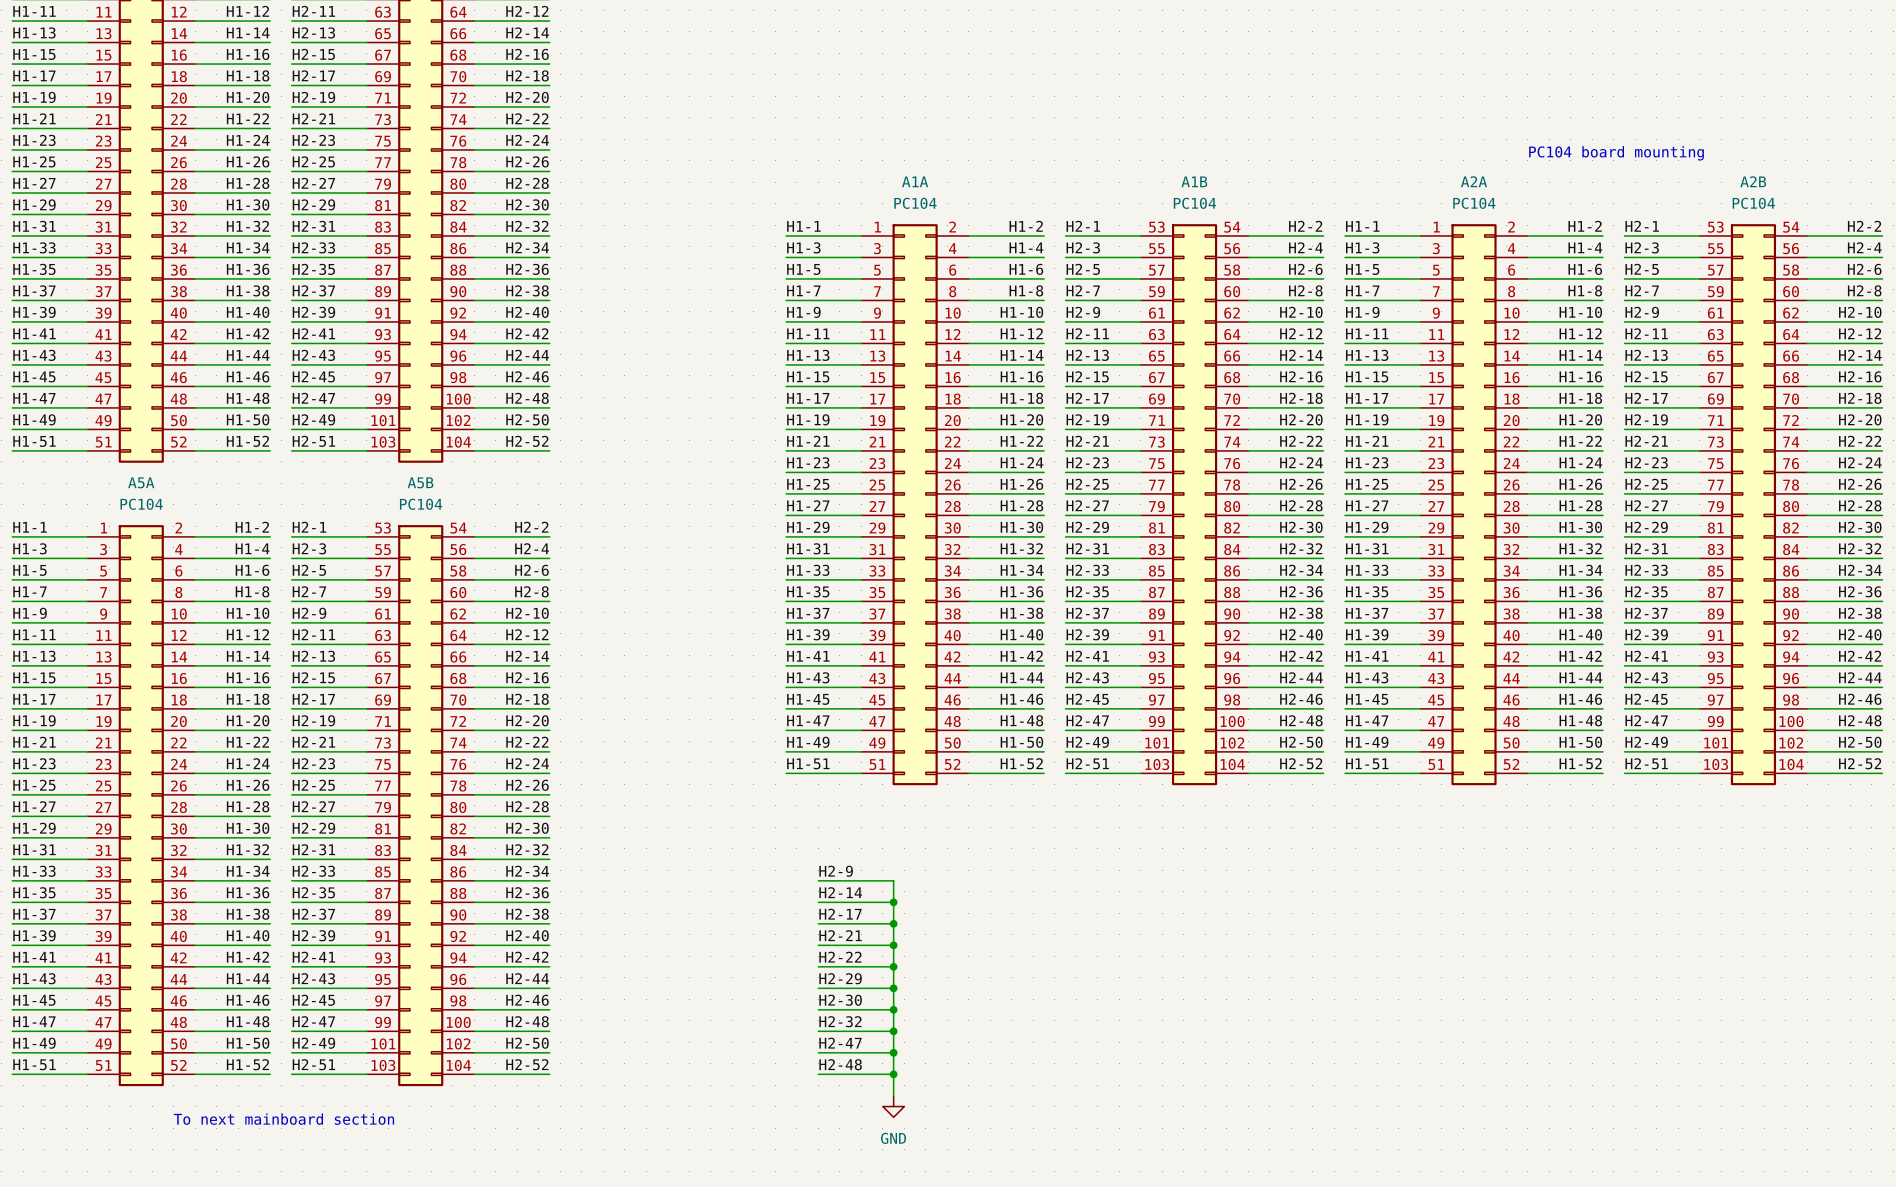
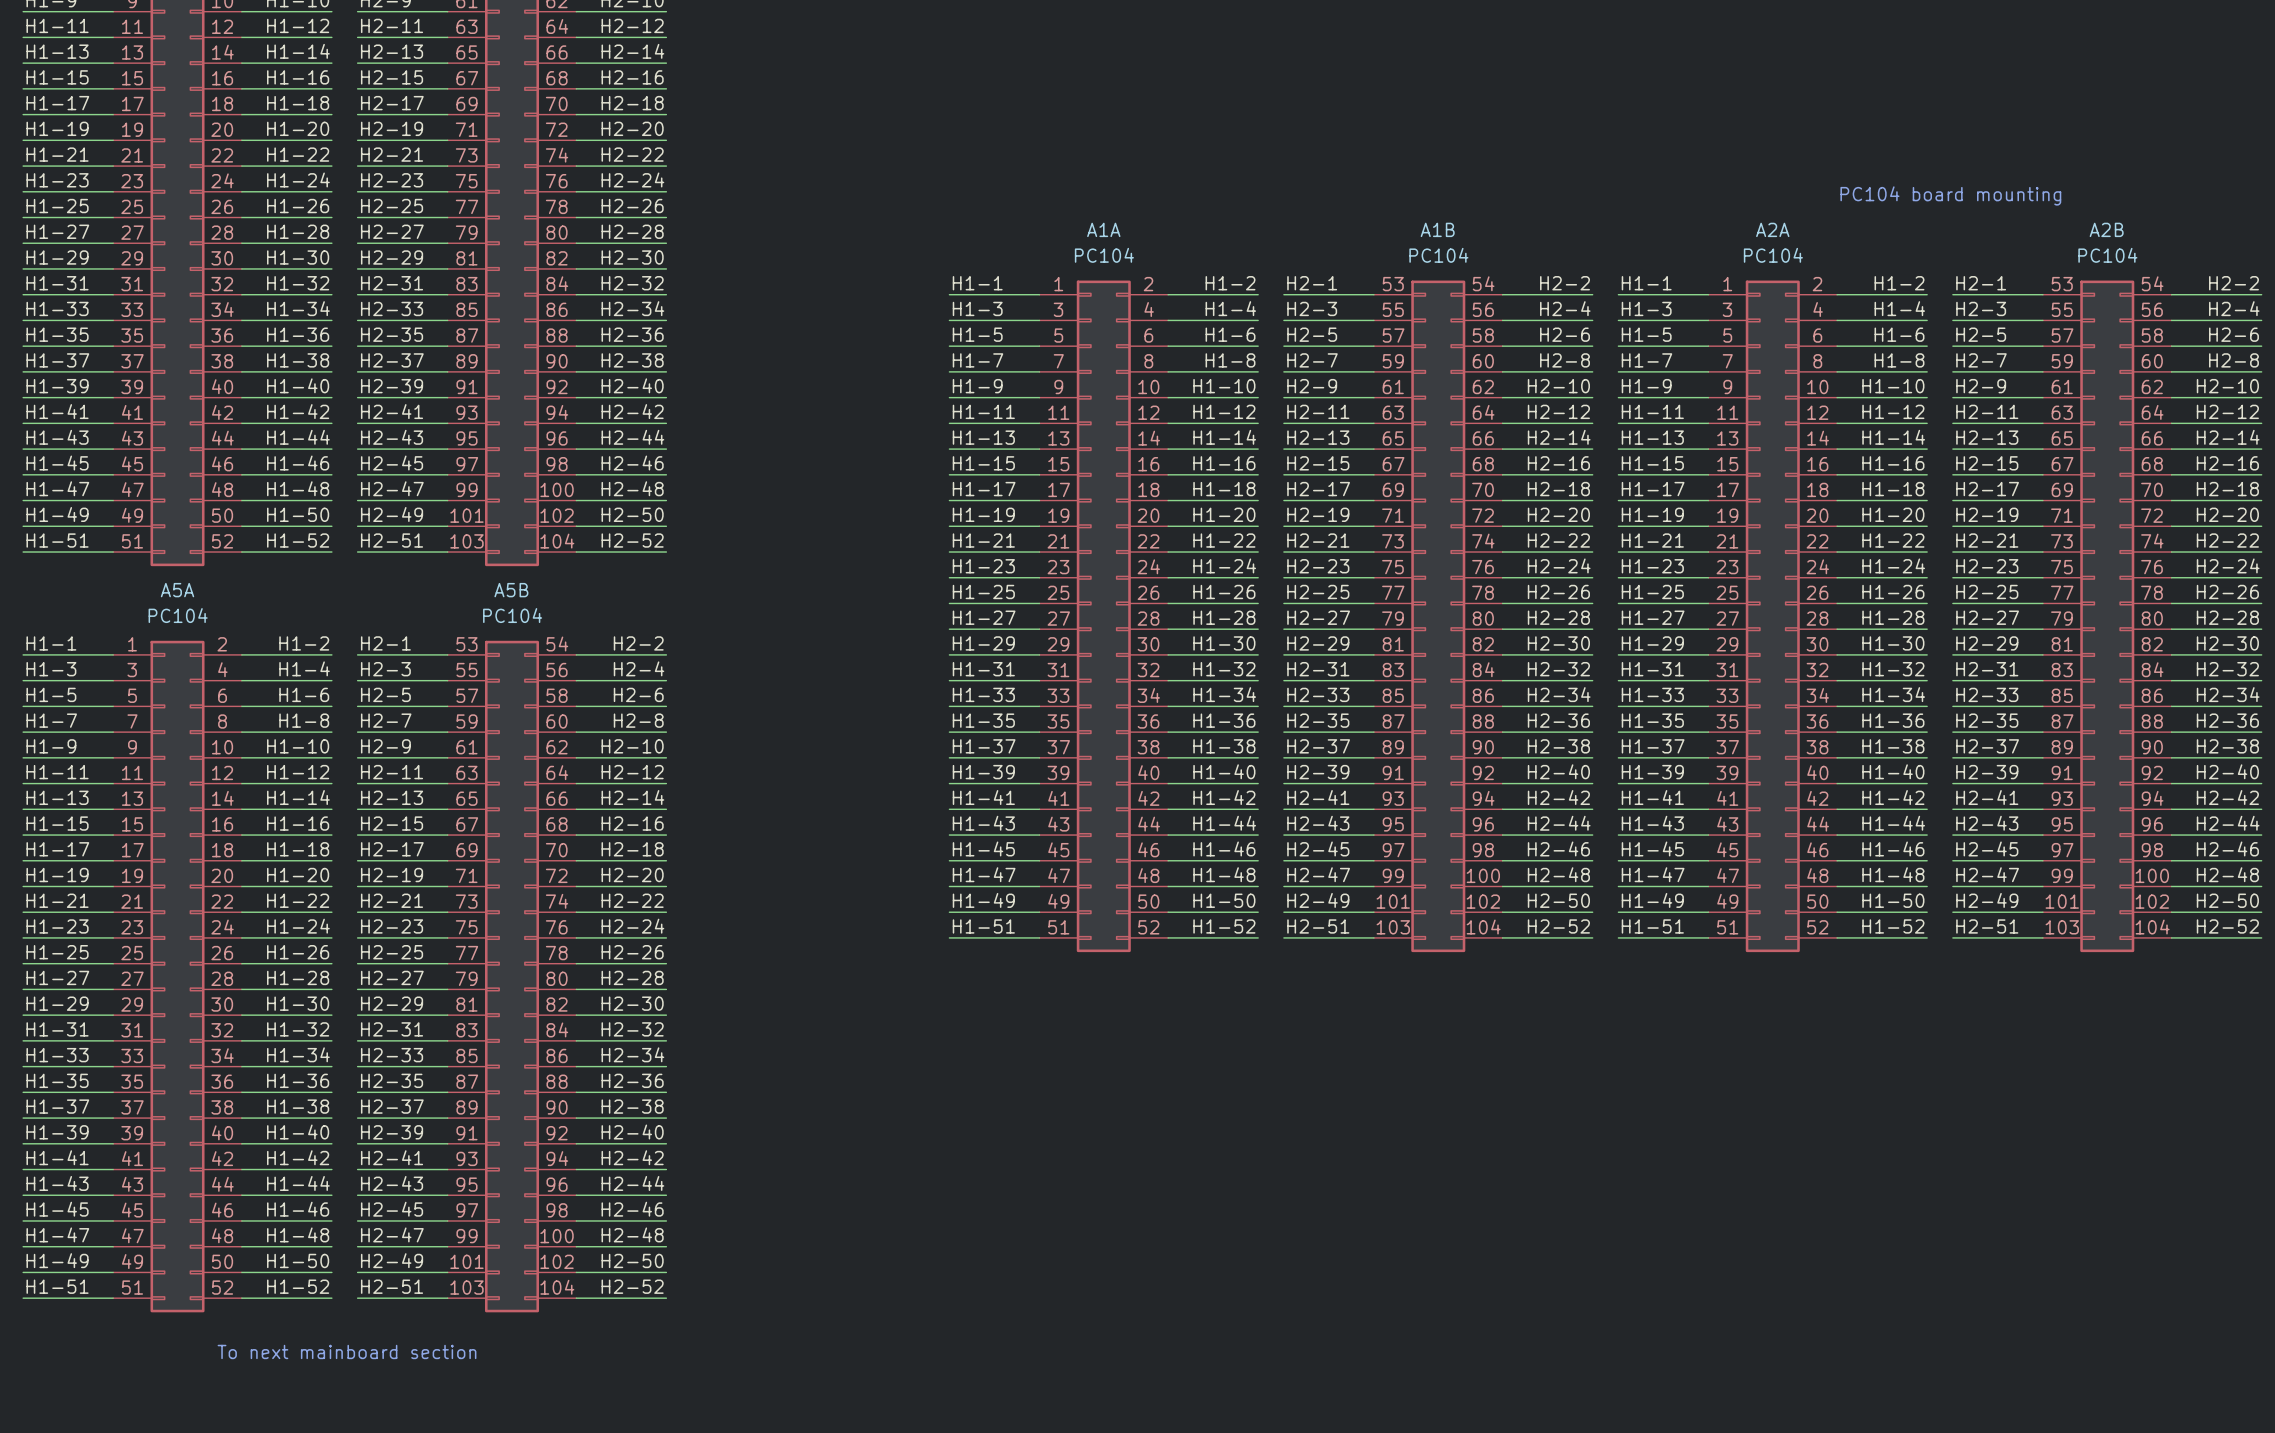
label: H2-9 (836, 871) -> none
wire: (818, 880) (893, 880) (893, 1095) -> none
label: H2-14 (840, 892) -> none
wire: (818, 902) (893, 902) -> none
junction: (893, 902) -> none
label: H2-17 (840, 914) -> none
wire: (818, 923) (893, 923) -> none
junction: (893, 923) -> none
label: H2-21 (840, 935) -> none
wire: (818, 945) (893, 945) -> none
junction: (893, 945) -> none
label: H2-22 (840, 957) -> none
wire: (818, 966) (893, 966) -> none
junction: (893, 966) -> none
label: H2-29 (840, 978) -> none
wire: (818, 988) (893, 988) -> none
junction: (893, 988) -> none
label: H2-30 (840, 1000) -> none
wire: (818, 1009) (893, 1009) -> none
junction: (893, 1009) -> none
label: H2-32 (840, 1021) -> none
wire: (818, 1031) (893, 1031) -> none
junction: (893, 1031) -> none
label: H2-47 (840, 1043) -> none
wire: (818, 1052) (893, 1052) -> none
junction: (893, 1052) -> none
label: H2-48 (840, 1064) -> none
wire: (818, 1074) (893, 1074) -> none
junction: (893, 1074) -> none
power symbol: GND (893, 1106) -> none

